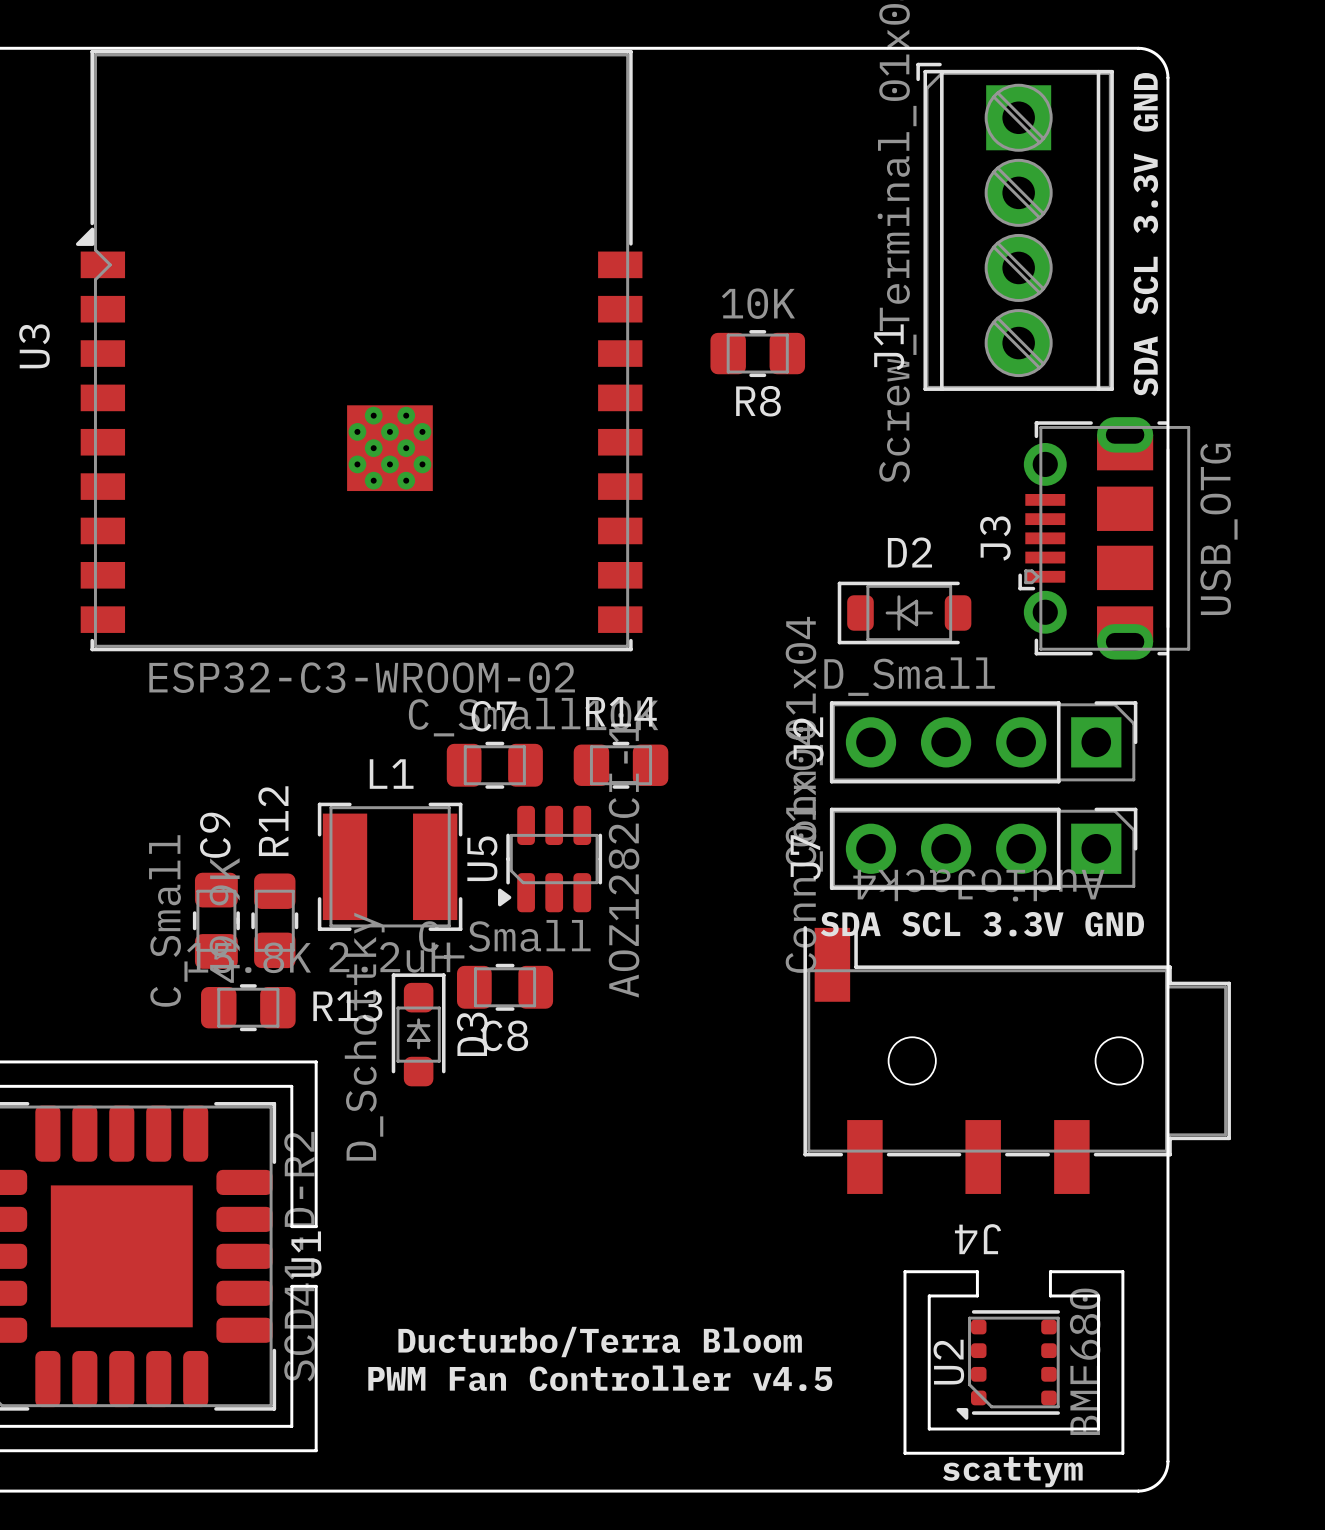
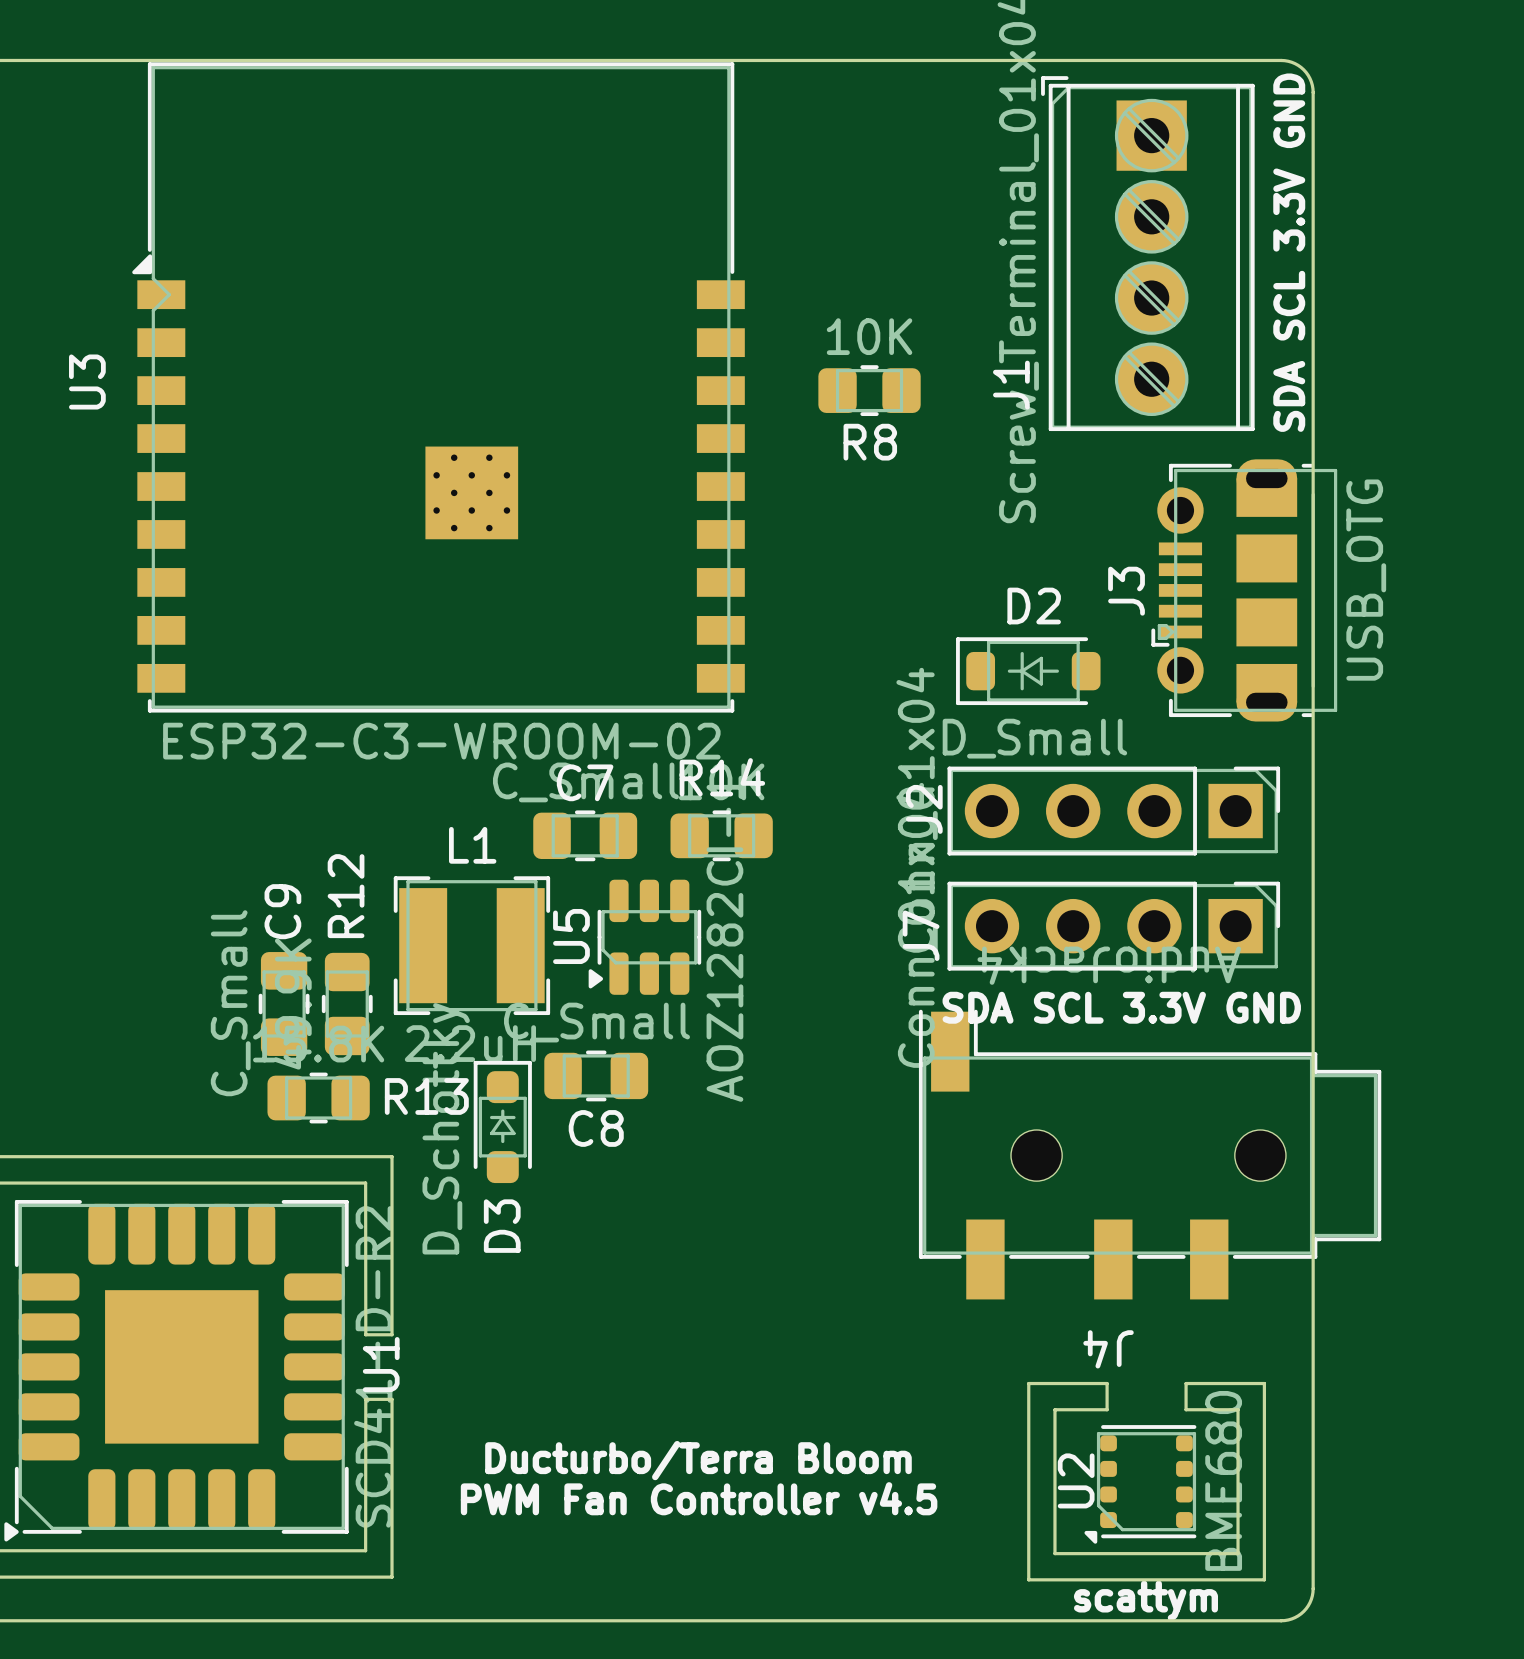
D3 name position: D3 (472, 1034) -> D3 (502, 1226)

